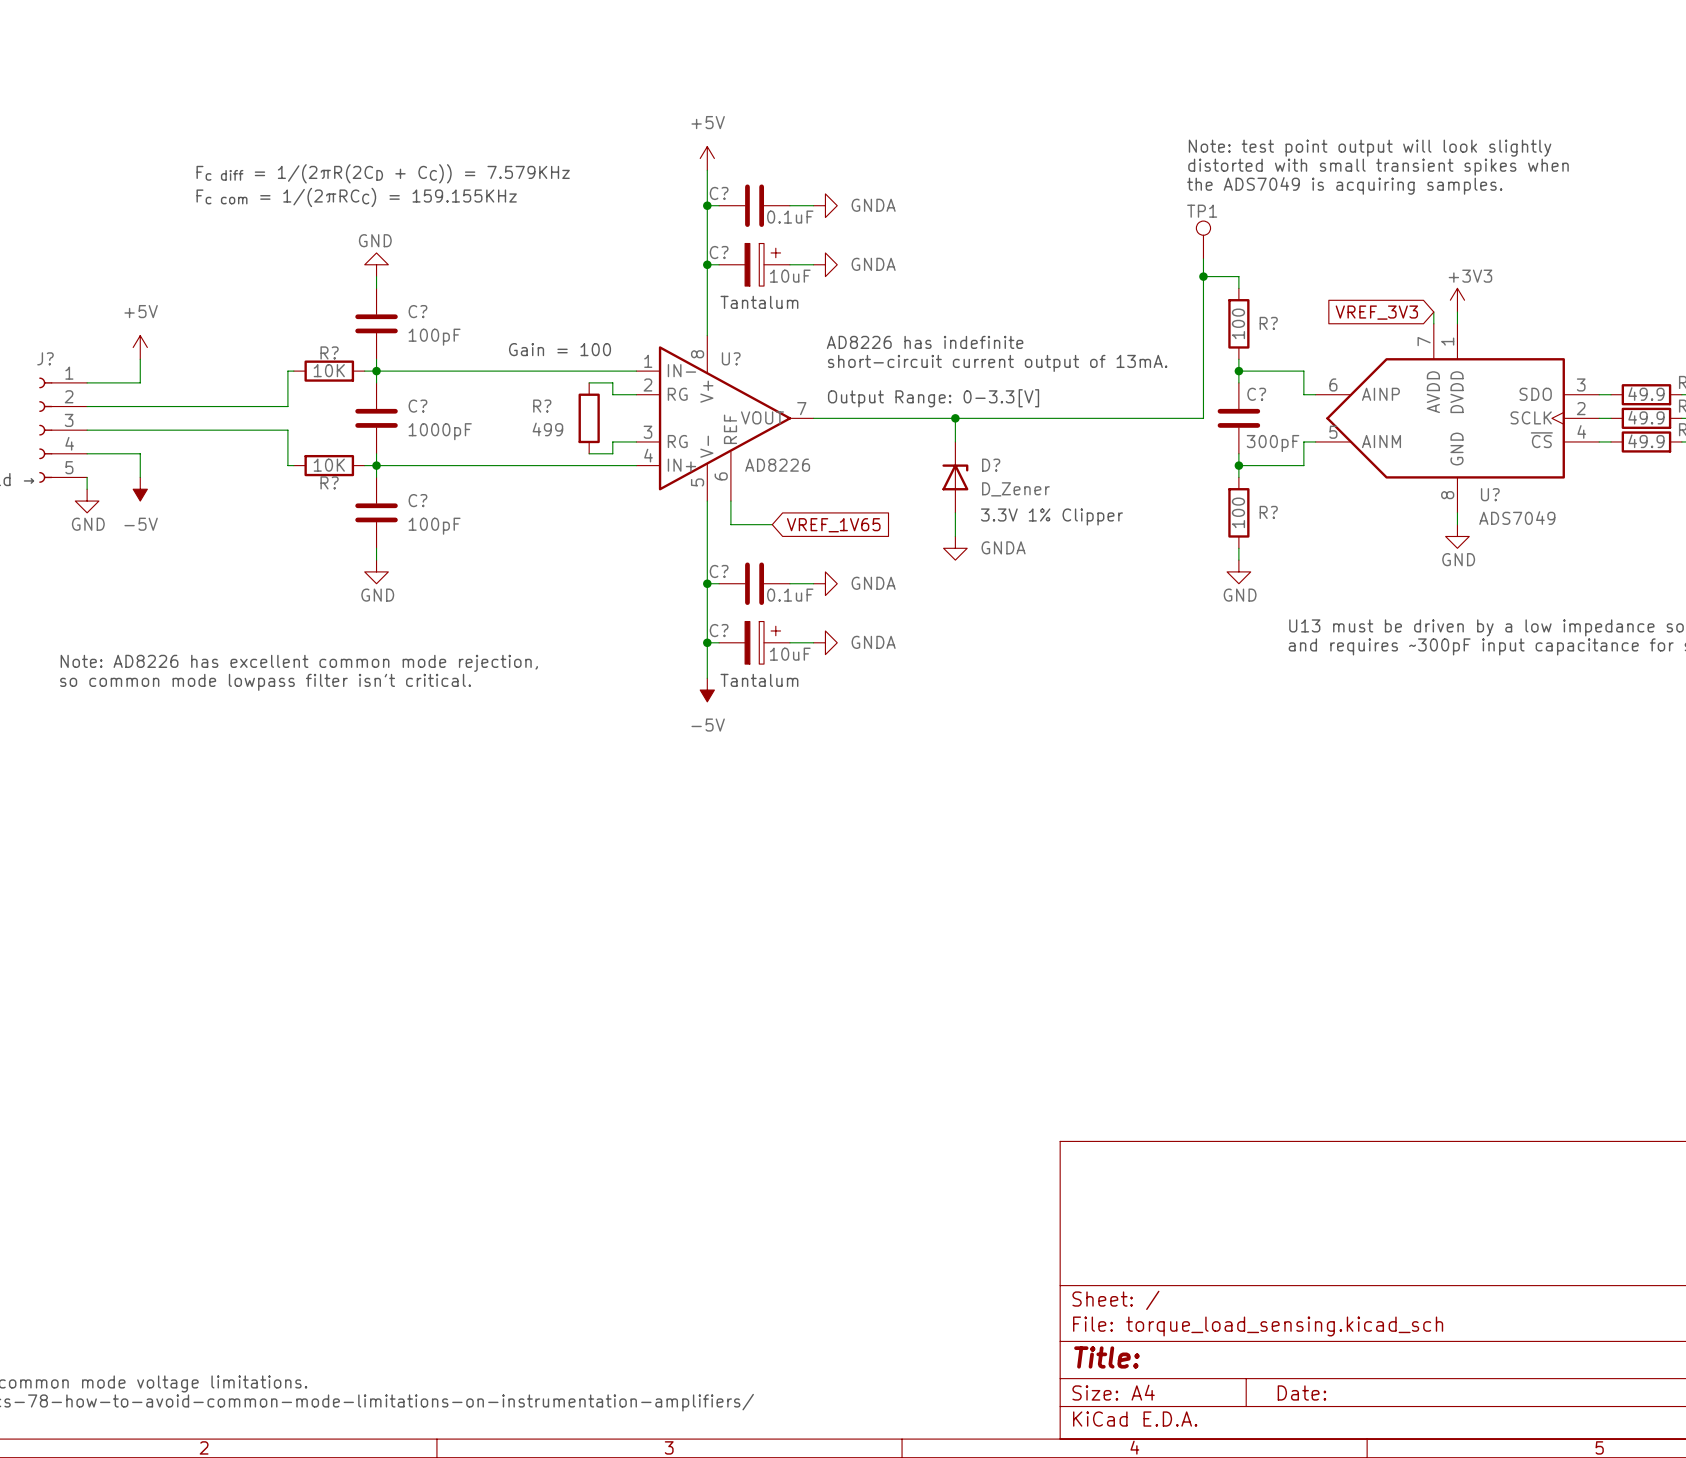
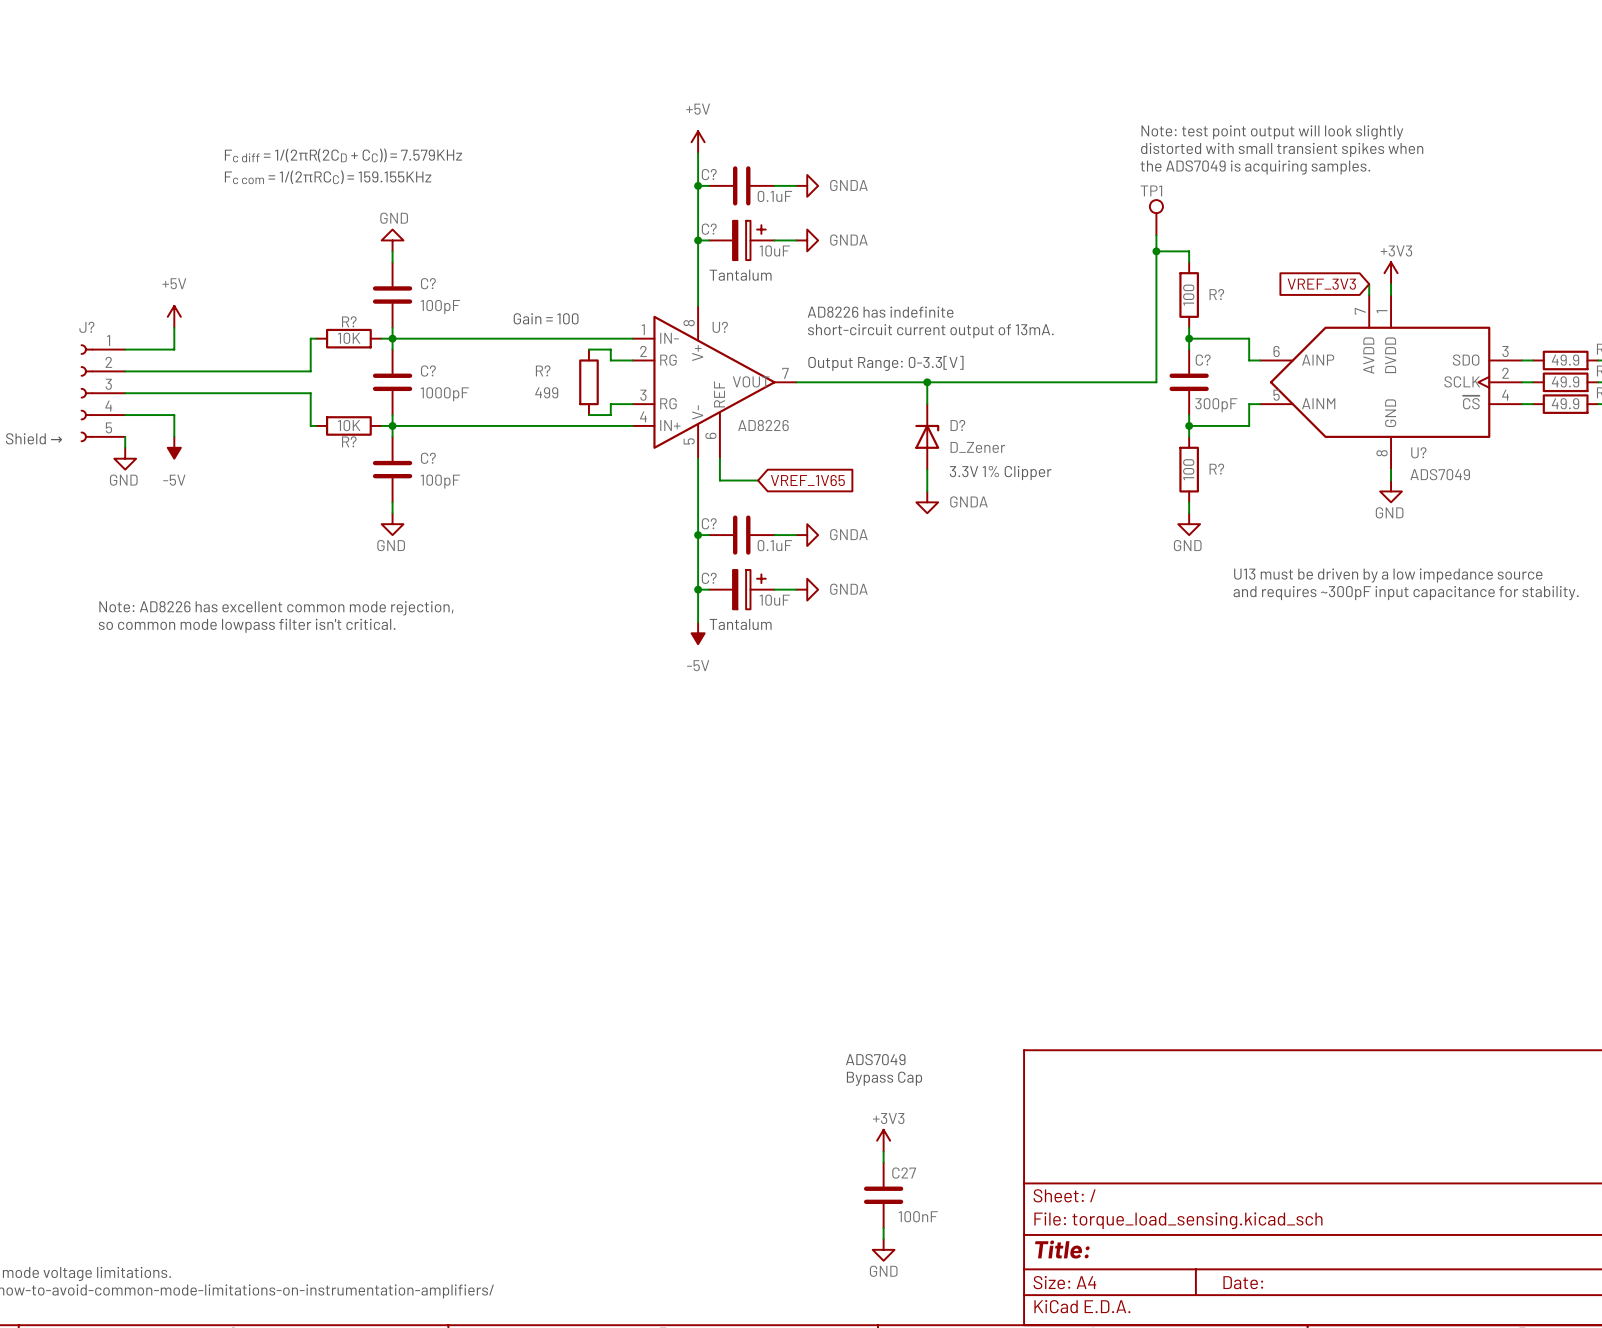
text: none -> ADS7049 (875, 1059)
text: none -> Bypass Cap (884, 1078)
power symbol: none -> +3V3 (883, 1140)
wire: none -> (883, 1151) (883, 1162)
C27: none -> 100nF (883, 1195)
wire: none -> (883, 1228) (883, 1238)
power symbol: none -> GND (883, 1249)

